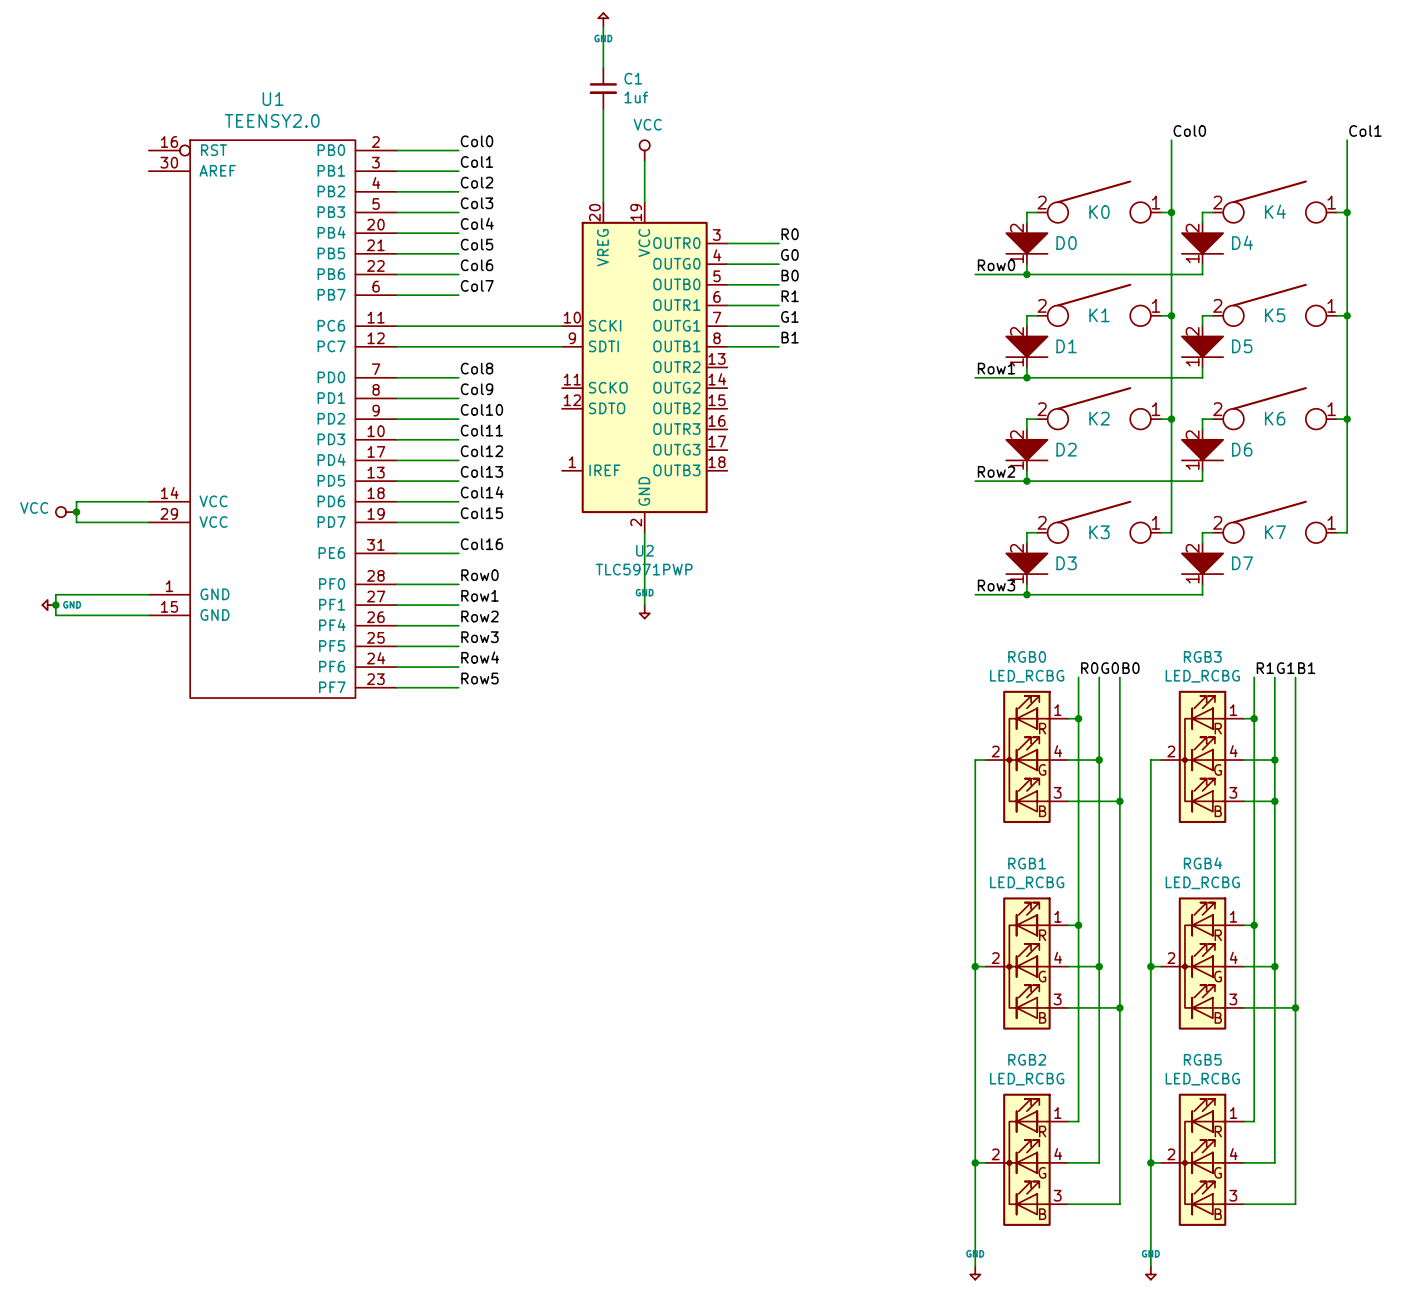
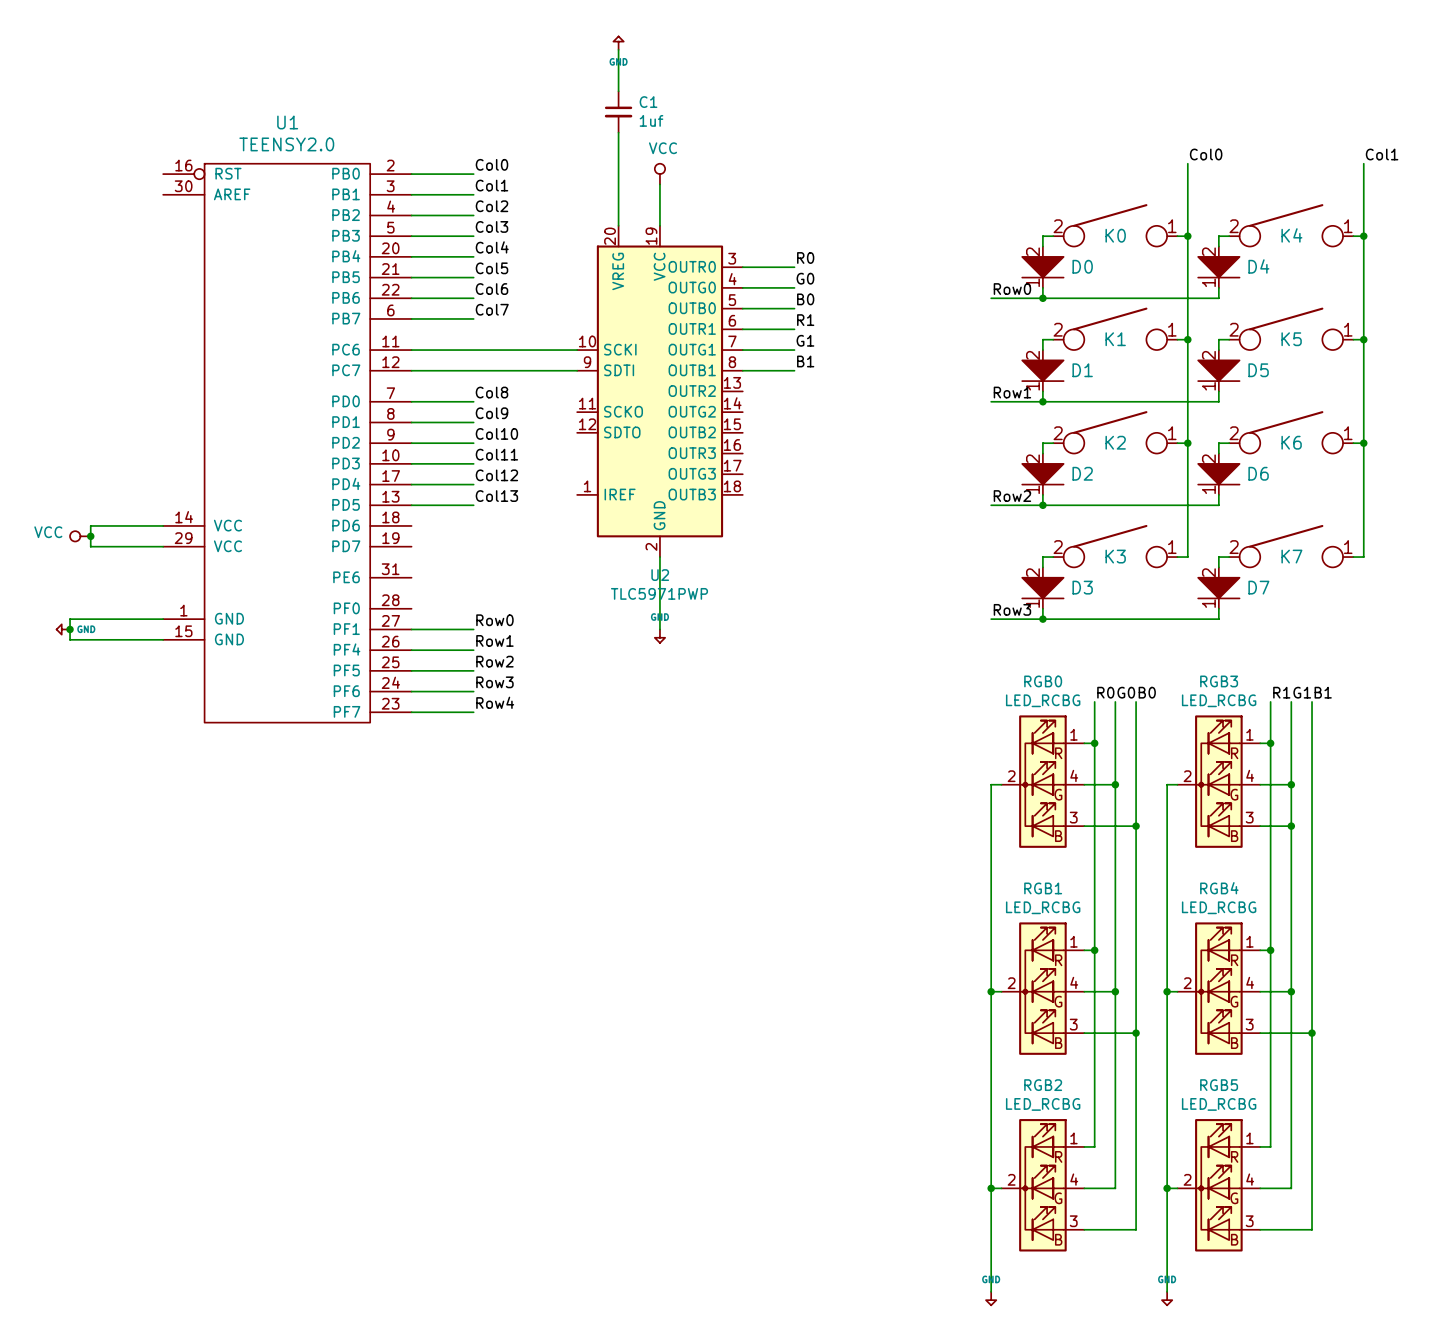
label: Col14 (482, 492) -> none
wire: (396, 501) (458, 501) -> none
label: Col15 (481, 513) -> none
wire: (396, 522) (458, 522) -> none
label: Col16 (481, 544) -> none
wire: (396, 553) (458, 553) -> none
label: Row0 (479, 575) -> none
wire: (396, 584) (458, 584) -> none
label: Row1 (479, 595) -> Row0 (494, 620)
label: Row2 (479, 616) -> Row1 (494, 640)
label: Row3 (479, 637) -> Row2 (494, 661)
label: Row4 (480, 657) -> Row3 (494, 682)
label: Row5 (479, 678) -> Row4 (495, 702)

